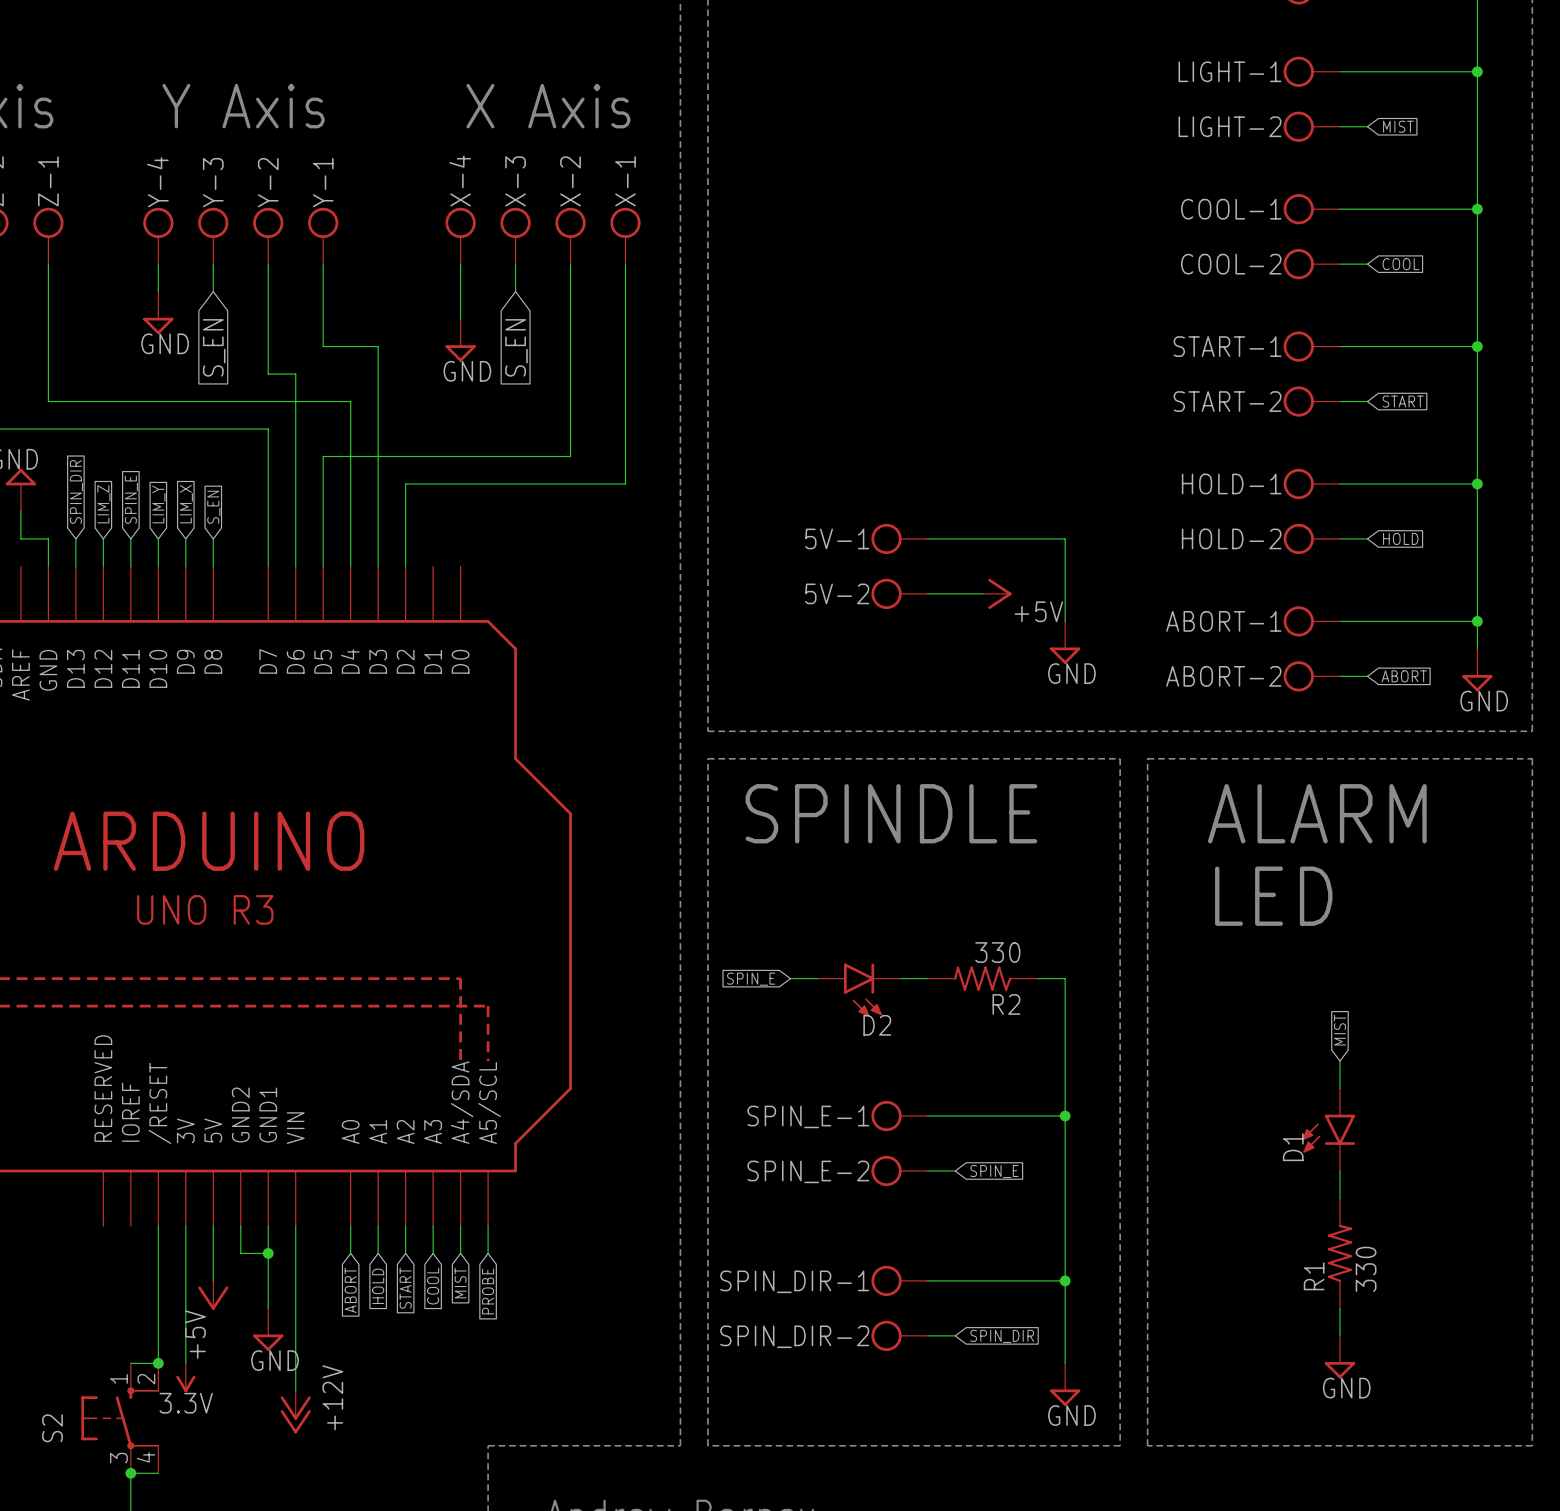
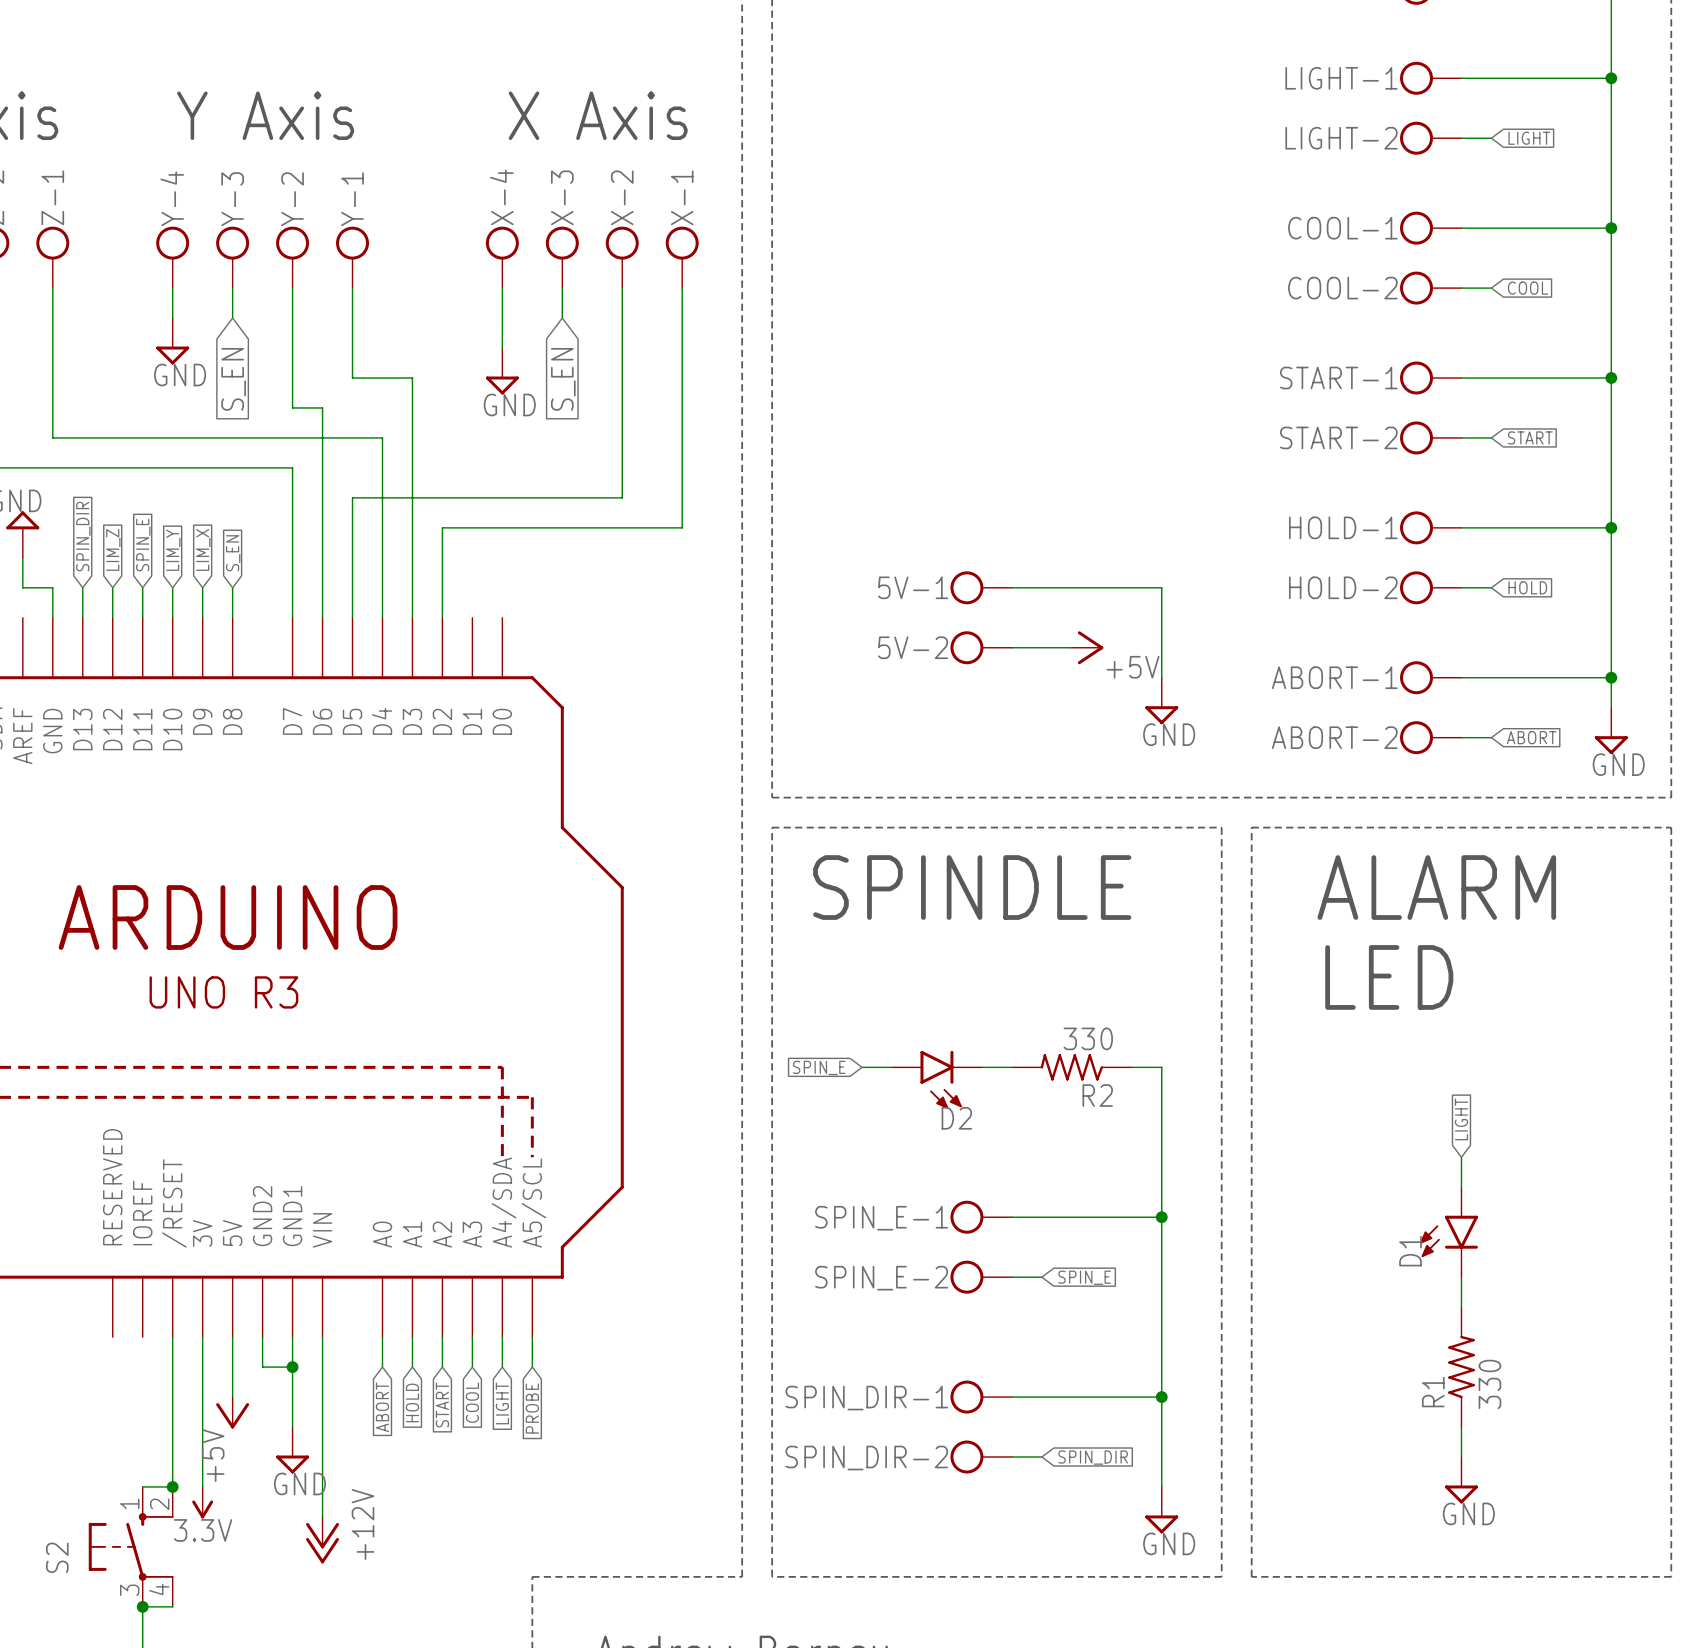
global label: MIST (1398, 126) -> LIGHT (1529, 138)
global label: MIST (1339, 1030) -> LIGHT (1461, 1119)
global label: MIST (460, 1282) -> LIGHT (502, 1403)

